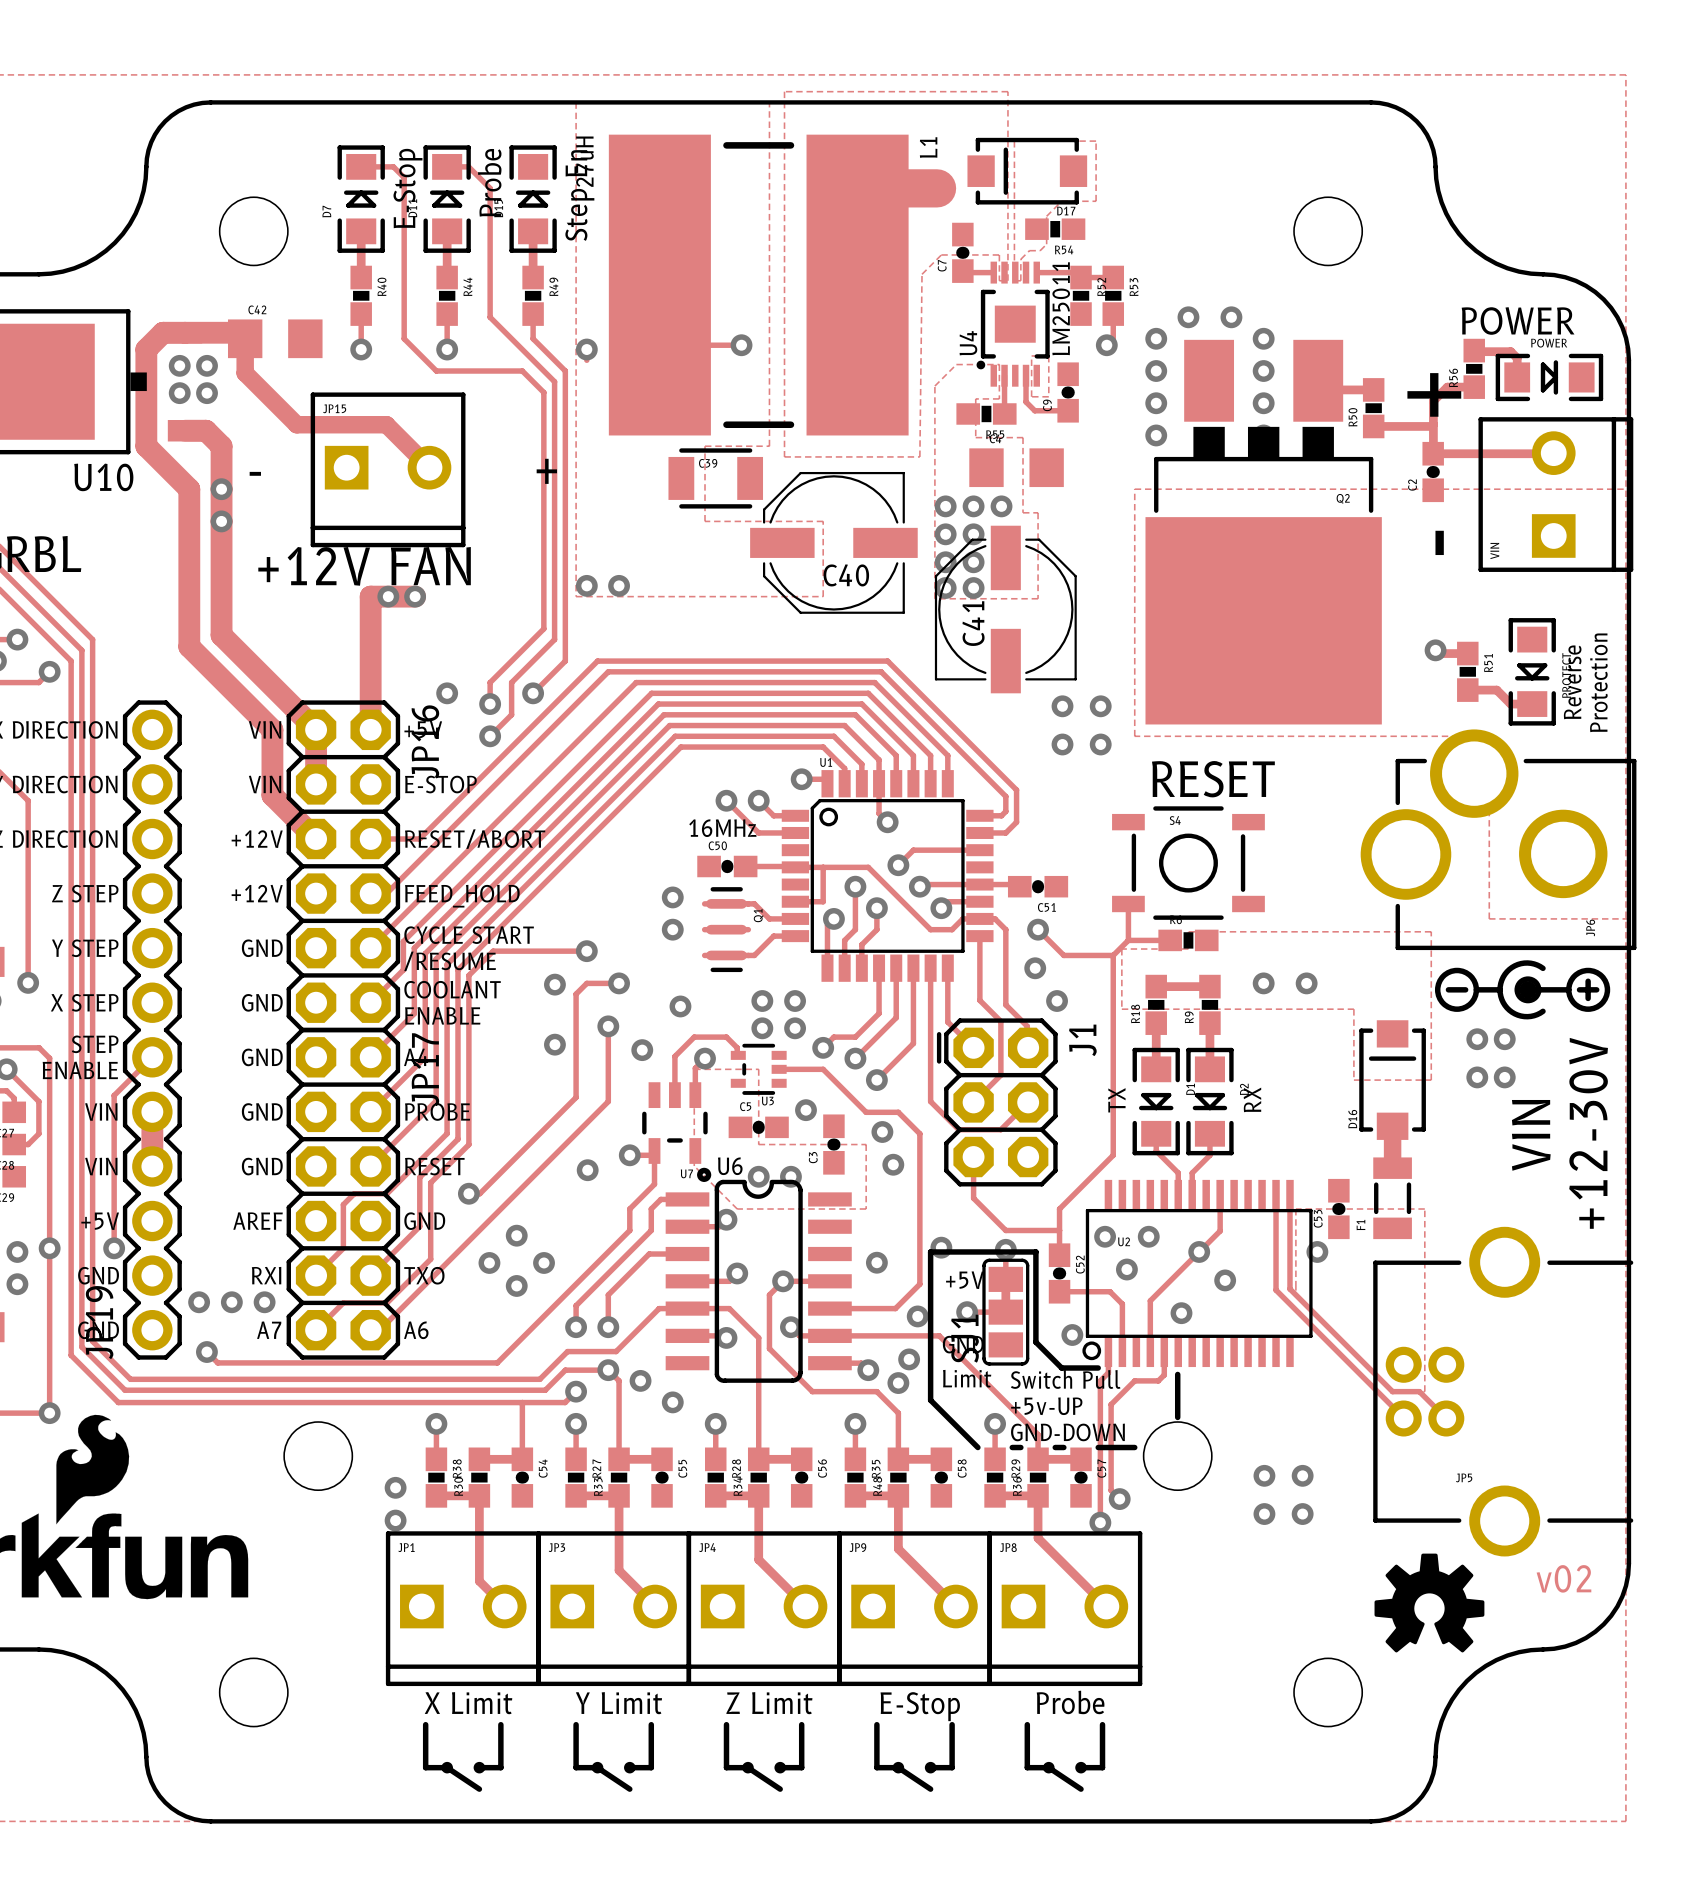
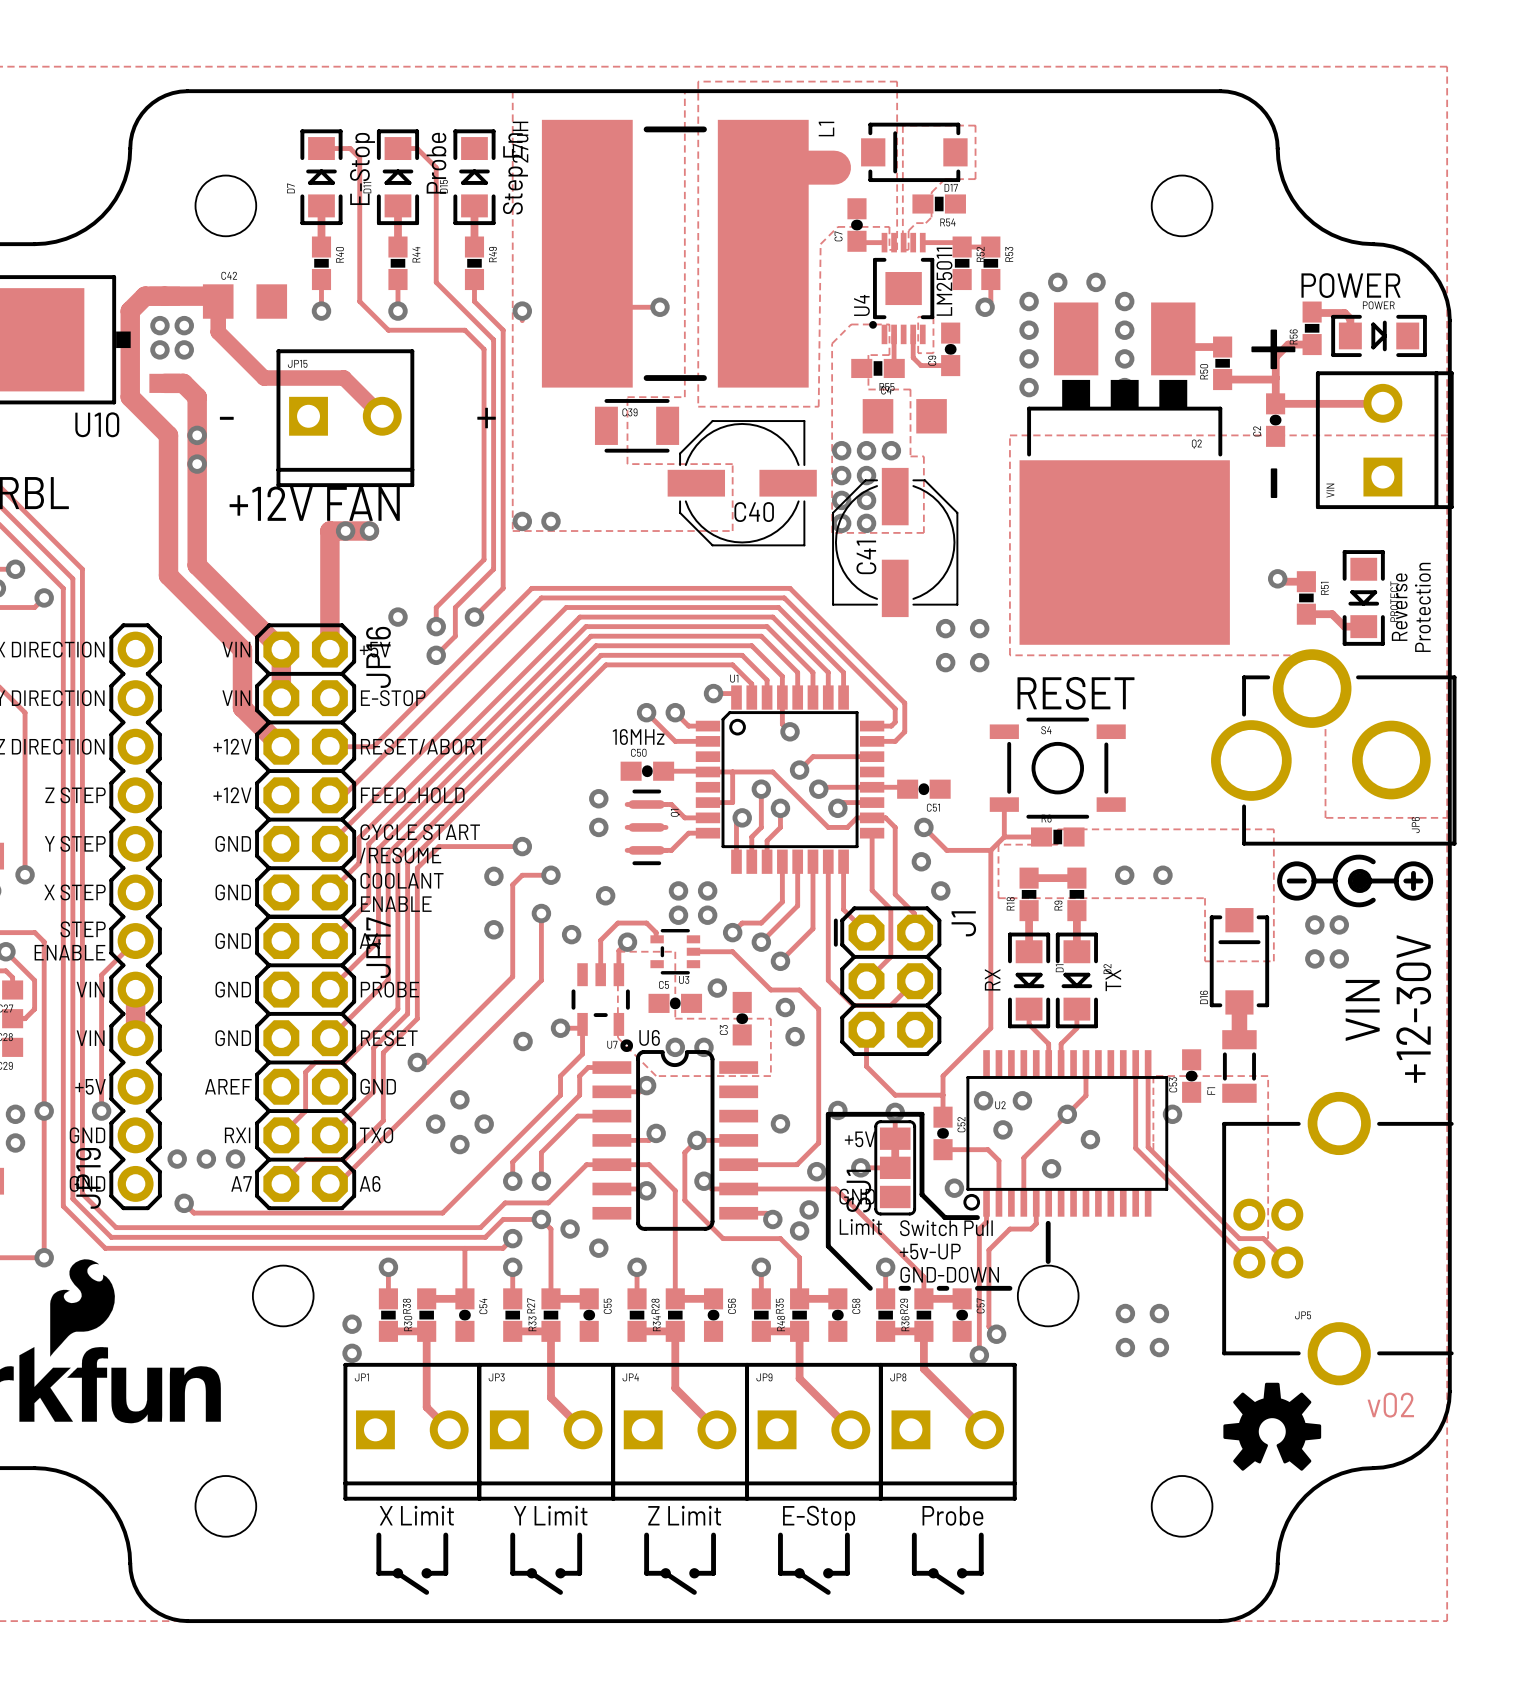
text: RX (1252, 1099) -> TX (1113, 980)
text: TX (1116, 1100) -> RX (992, 979)

